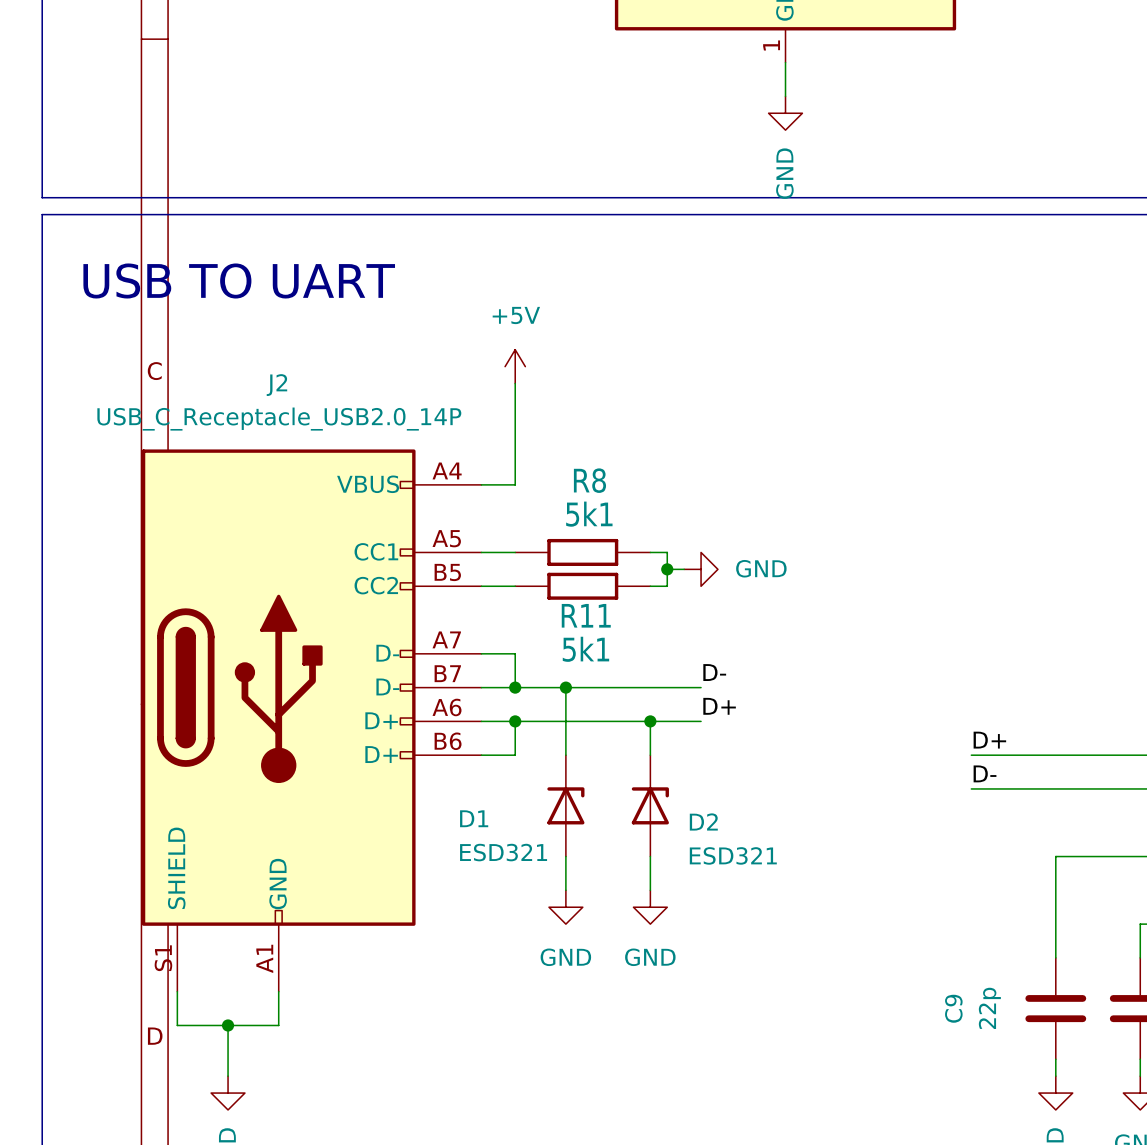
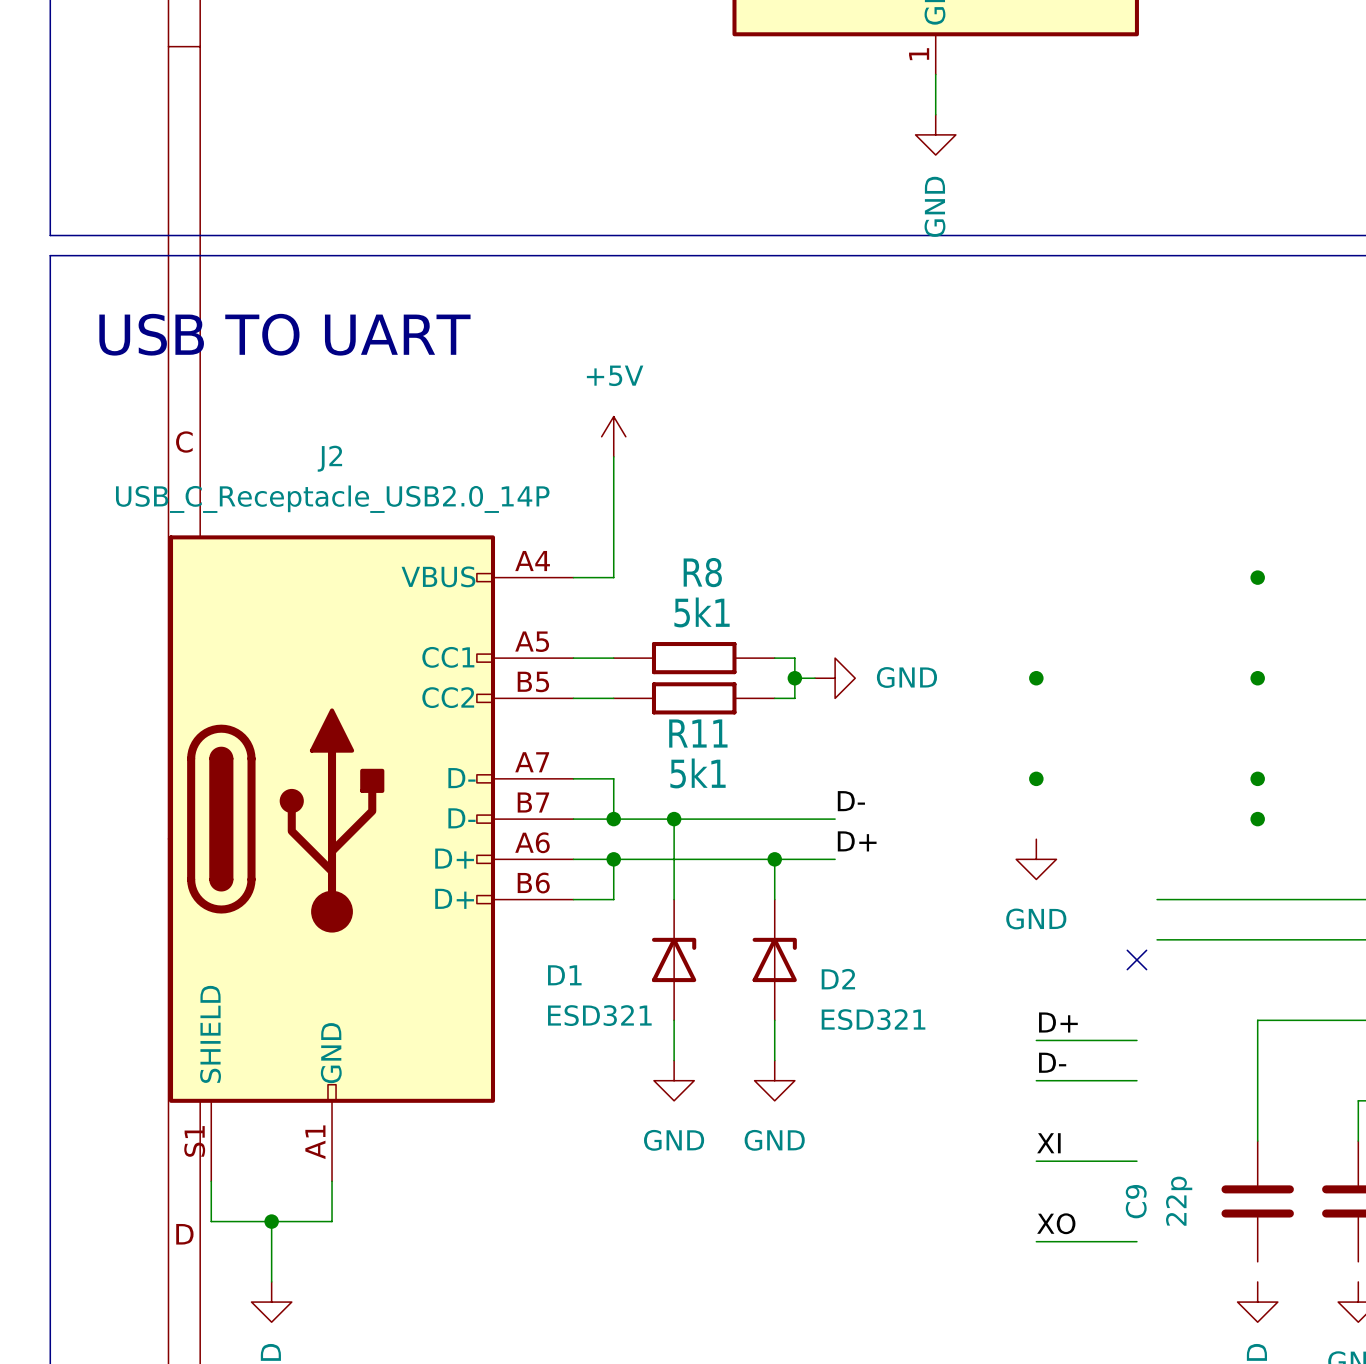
junction: none -> (1257, 577)
junction: none -> (1036, 678)
junction: none -> (1257, 678)
junction: none -> (1036, 778)
junction: none -> (1257, 778)
junction: none -> (1257, 819)
power symbol: none -> GND (1036, 859)
label position: D+ (989, 740) -> D+ (1058, 1022)
label position: D- (985, 773) -> D- (1052, 1062)
no-connect mark: none -> (1136, 959)
wire: none -> (1036, 1040) (1136, 1040)
wire: none -> (1036, 1080) (1136, 1080)
label: none -> XI (1048, 1143)
wire: none -> (1036, 1161) (1136, 1161)
label: none -> XO (1056, 1223)
wire: none -> (1036, 1241) (1136, 1241)
wire: (1055, 1059) (1055, 1076) -> none
wire: (1140, 1059) (1140, 1076) -> none

